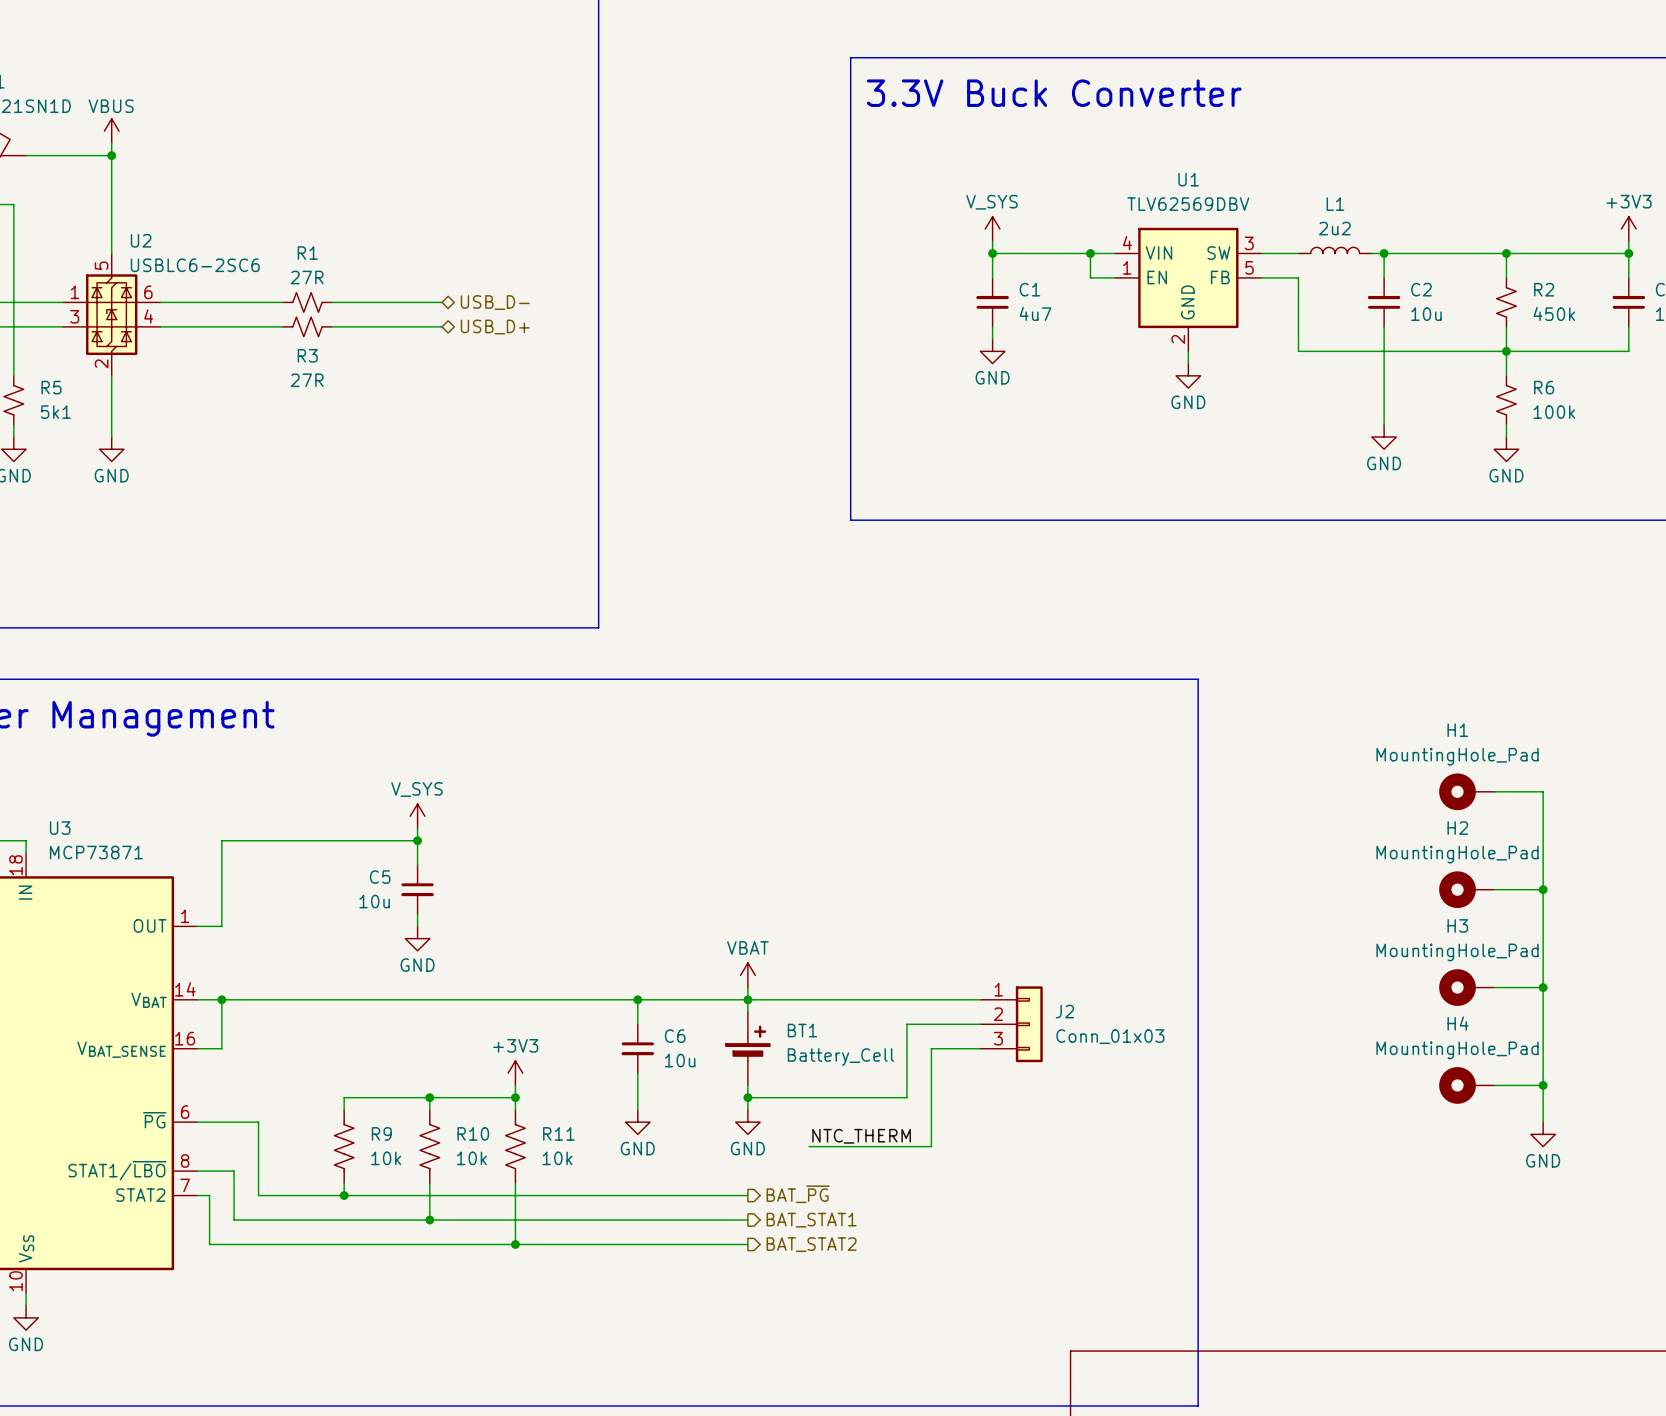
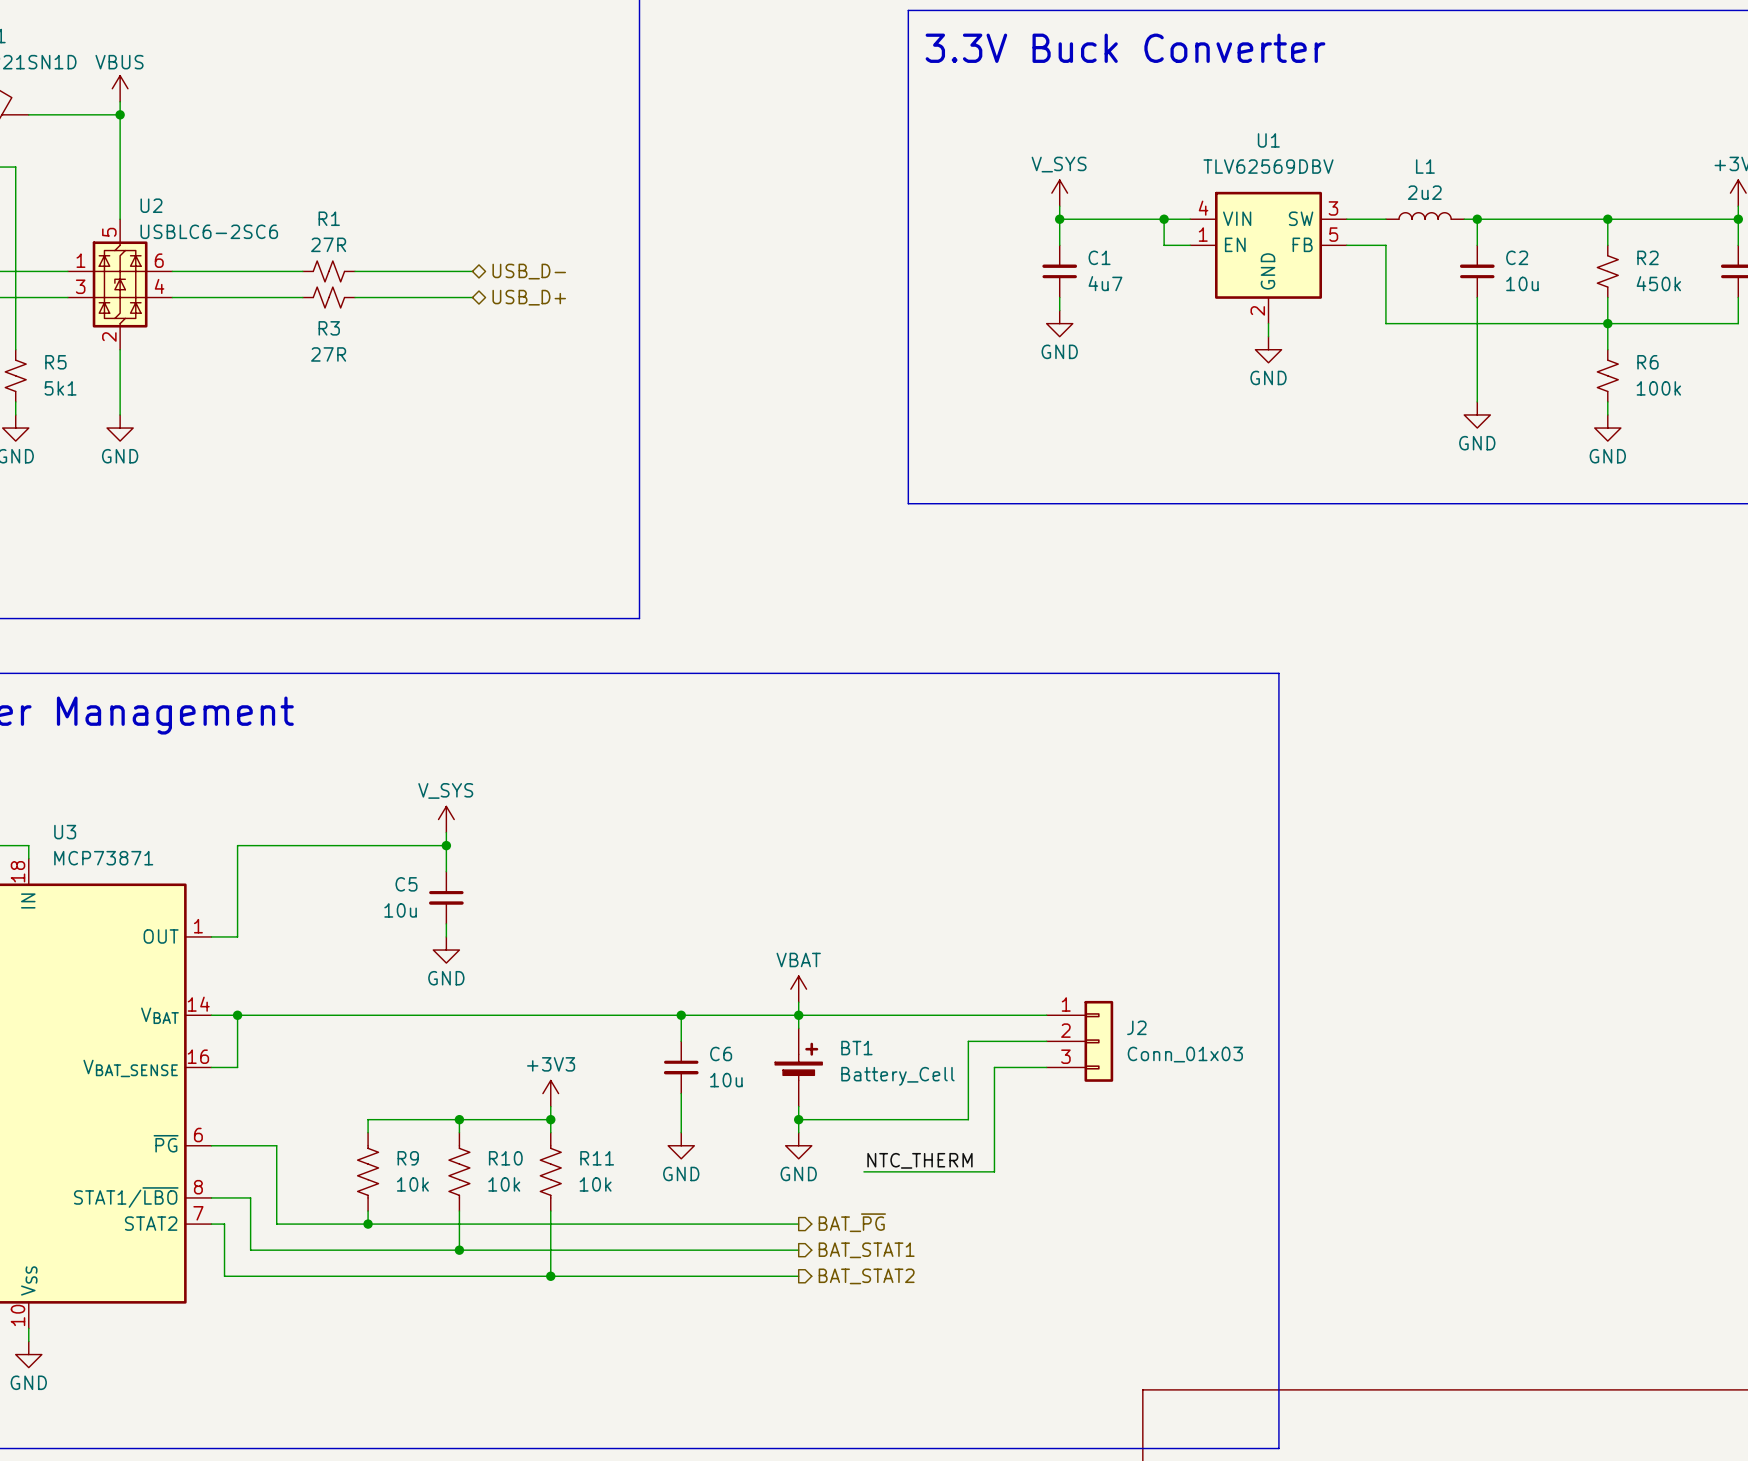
H1: MountingHole_Pad (1466, 791) -> none
wire: (1494, 791) (1543, 791) (1543, 1122) -> none
H2: MountingHole_Pad (1466, 889) -> none
wire: (1494, 889) (1543, 889) -> none
junction: (1543, 889) -> none
H3: MountingHole_Pad (1466, 987) -> none
wire: (1494, 987) (1543, 987) -> none
junction: (1543, 987) -> none
H4: MountingHole_Pad (1466, 1085) -> none
wire: (1494, 1085) (1543, 1085) -> none
junction: (1543, 1085) -> none
power symbol: GND (1543, 1134) -> none

